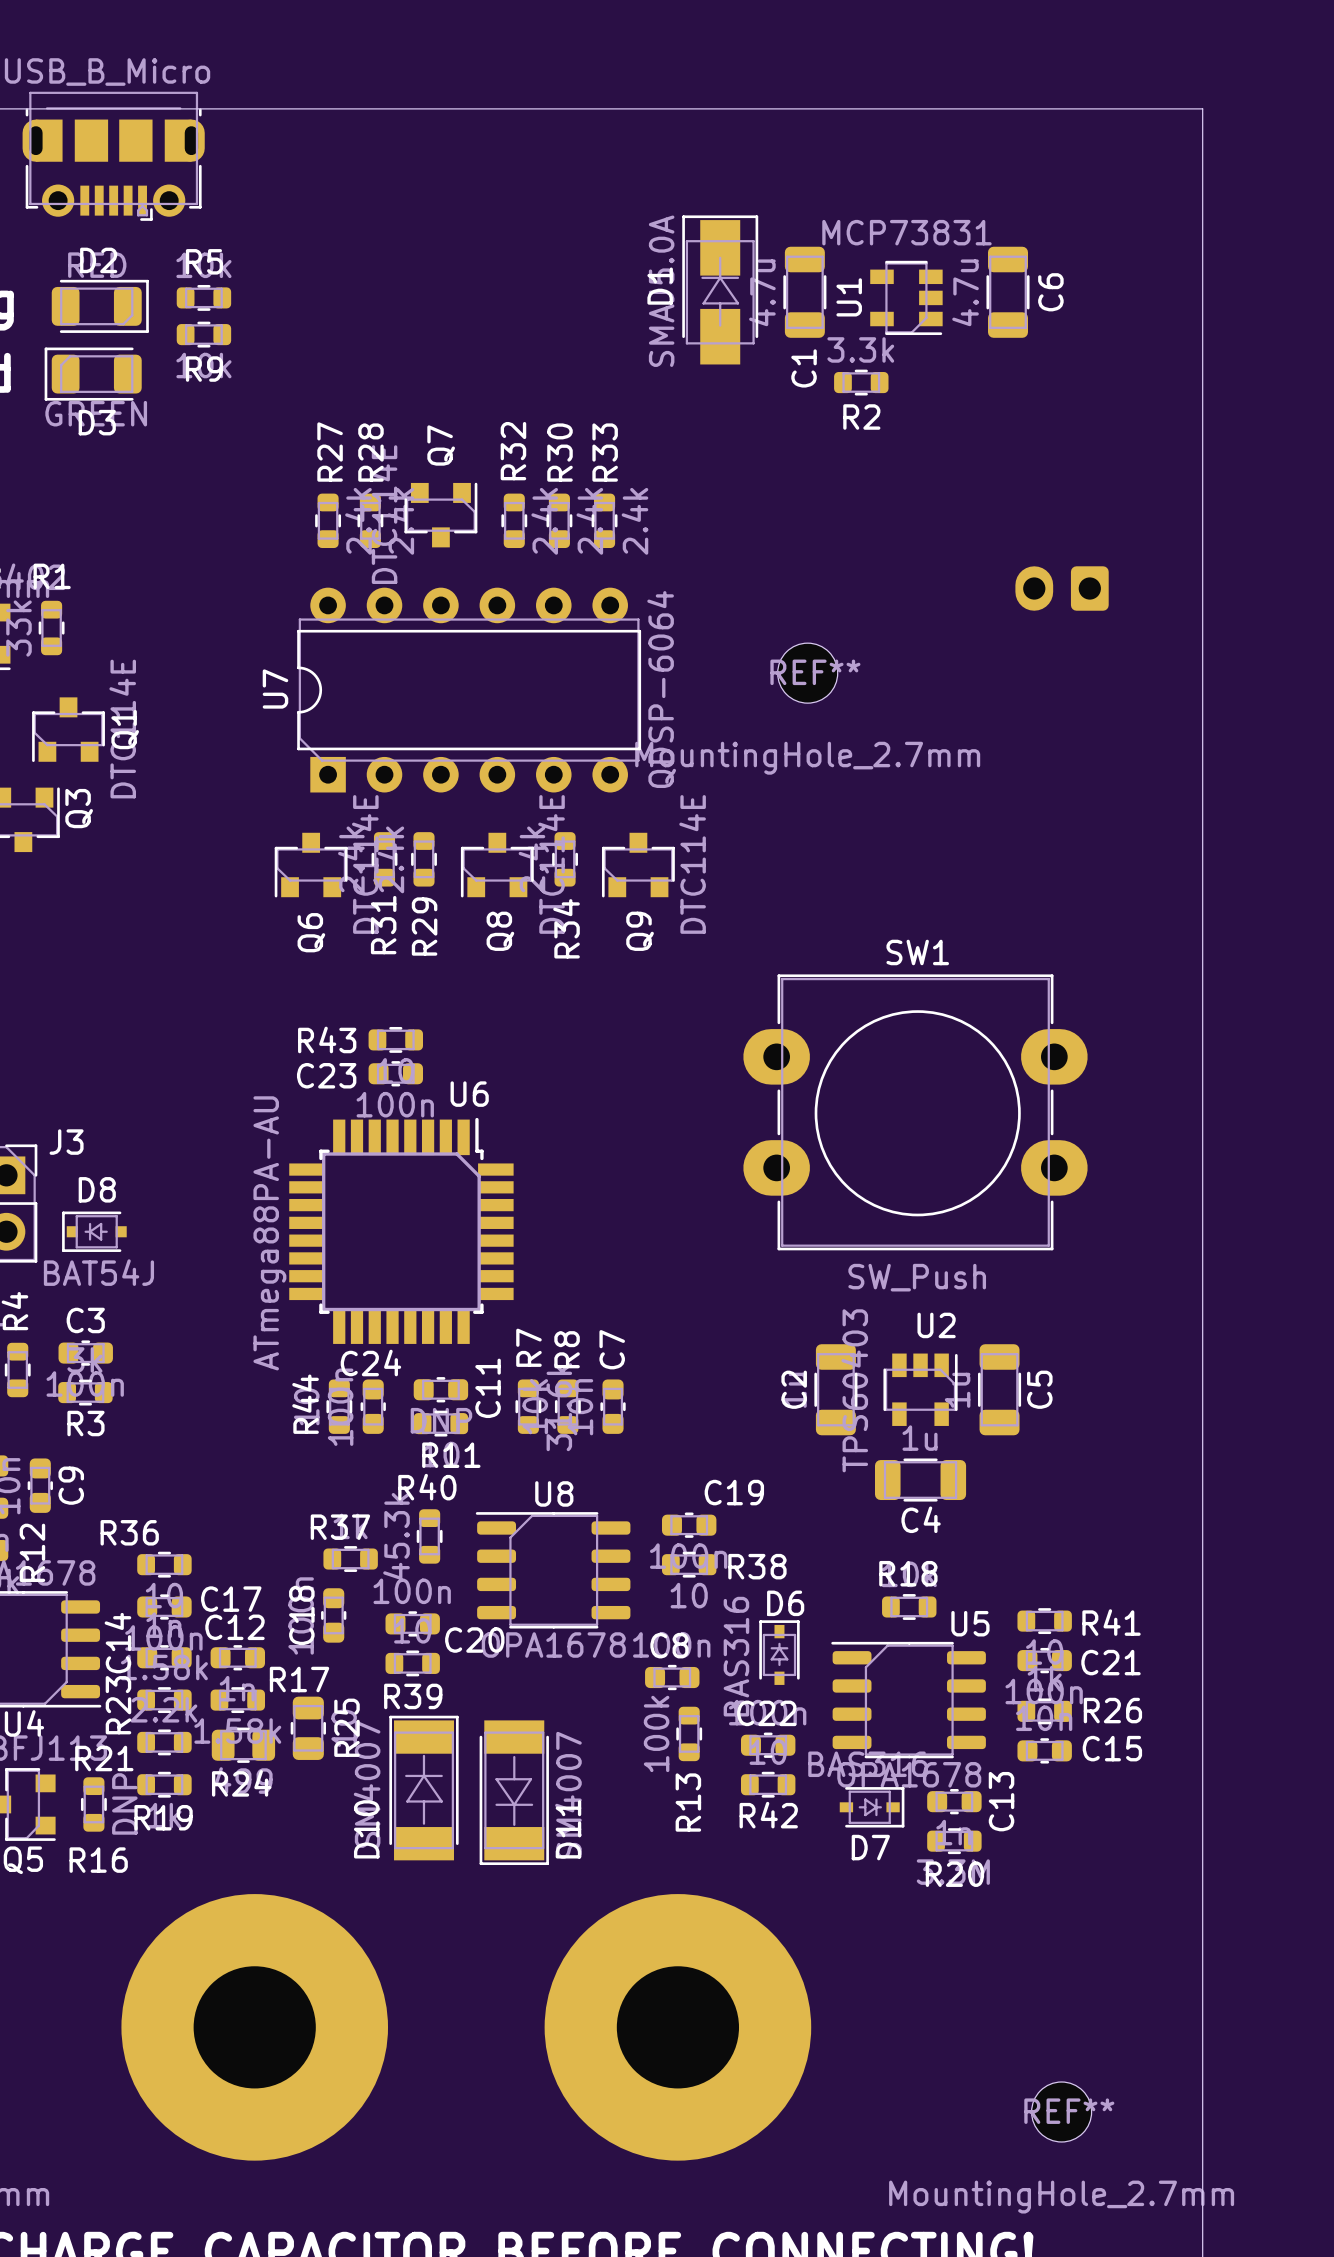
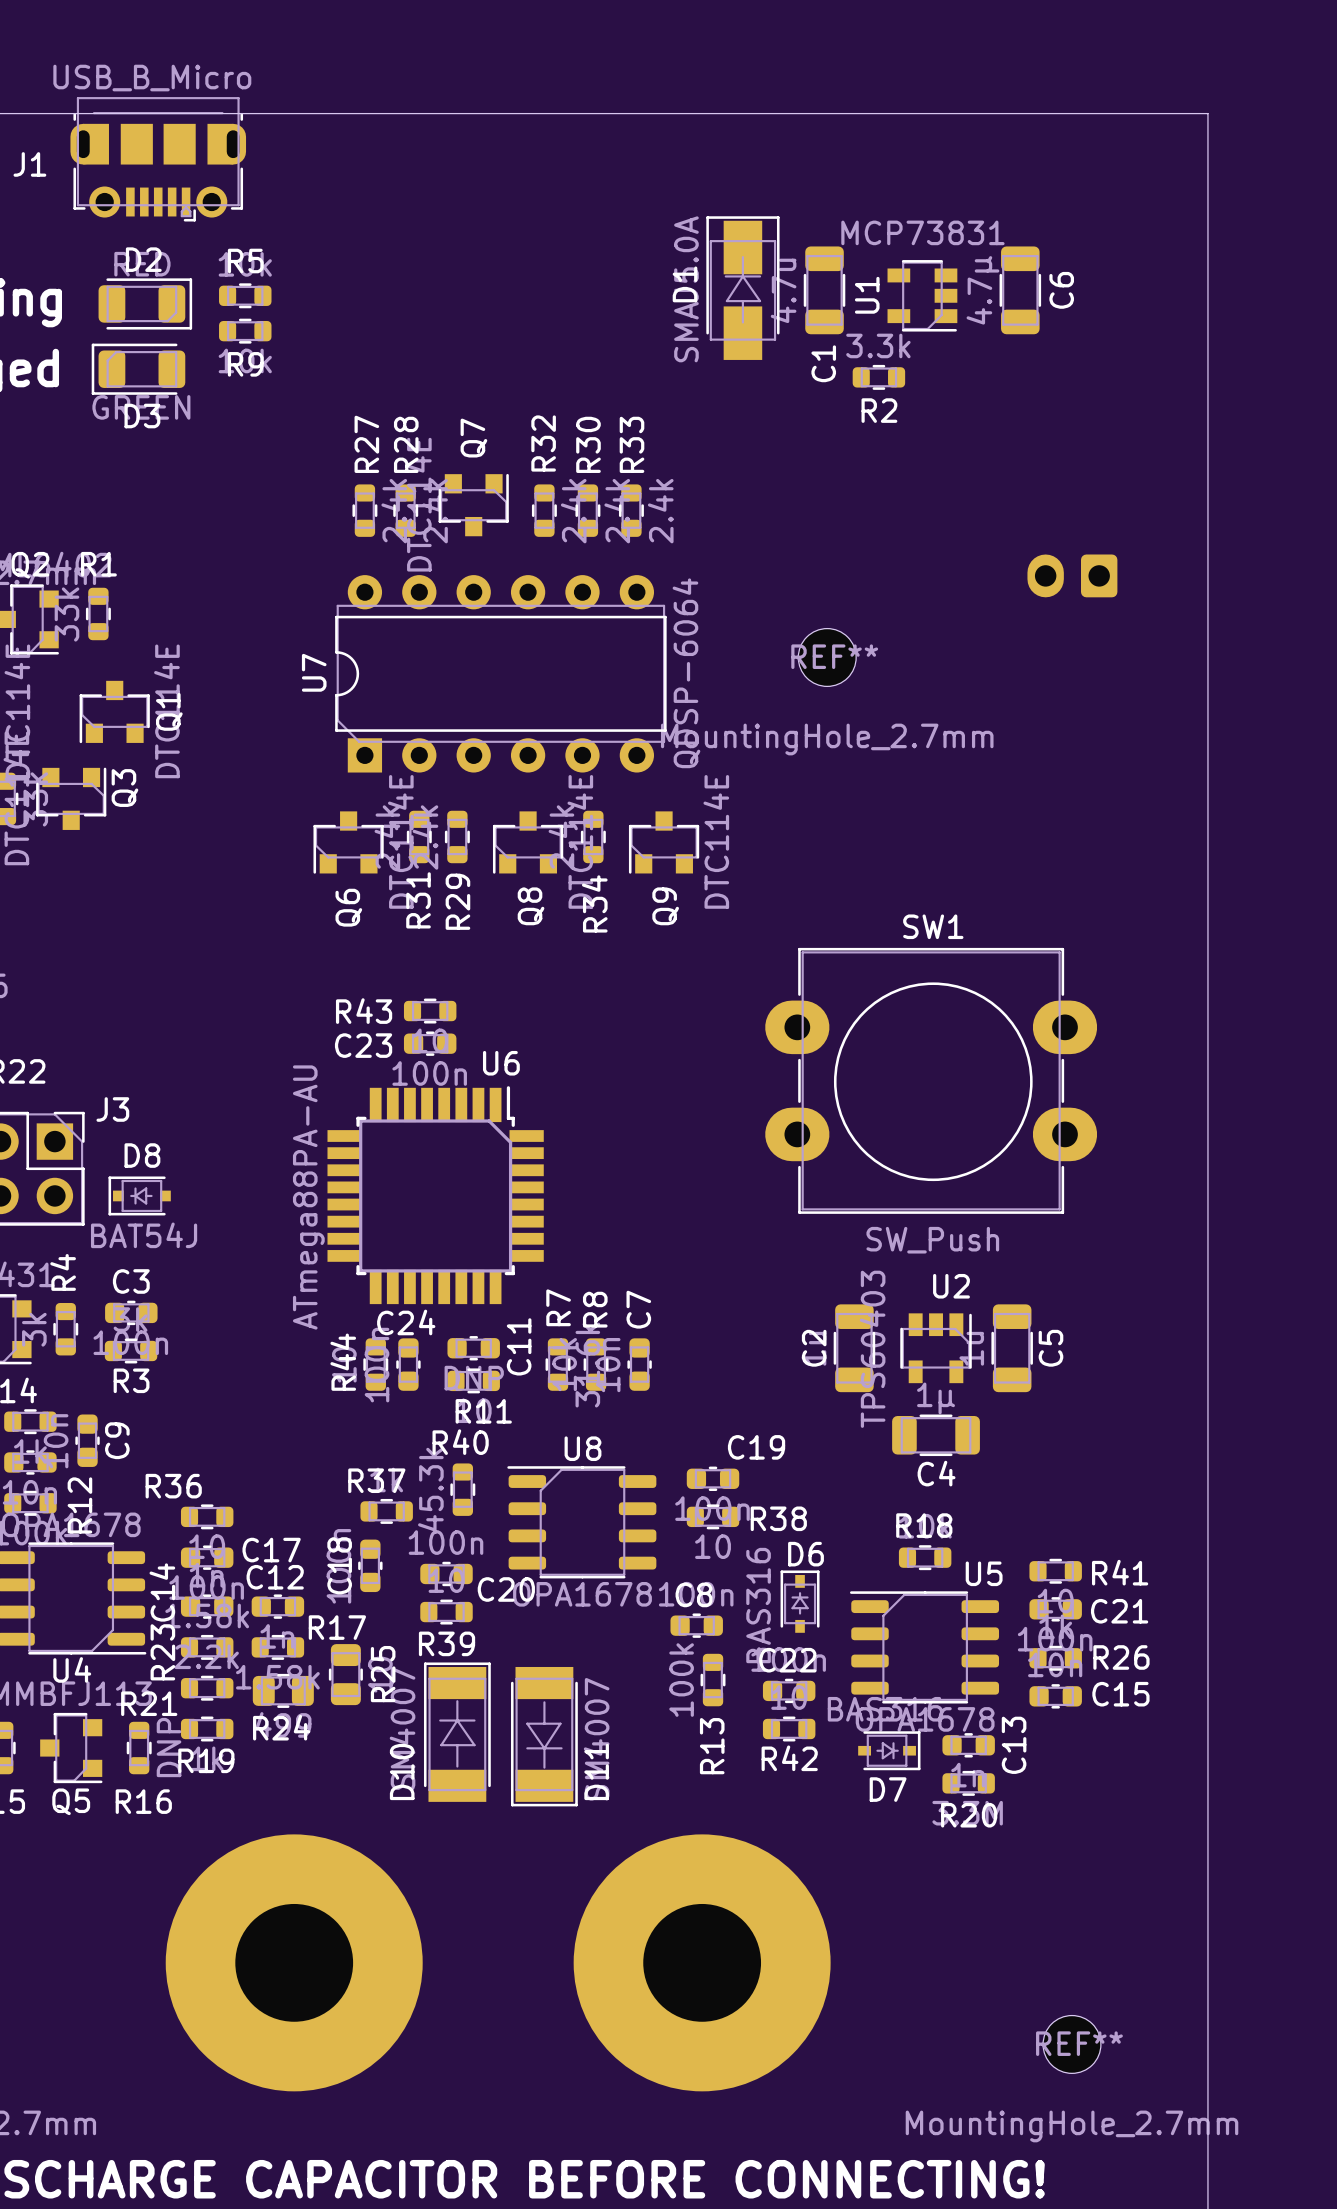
C6 value: 4.7u (965, 292) -> 4.7μ (982, 290)
C4 value: 1u (920, 1438) -> 1μ (936, 1398)

